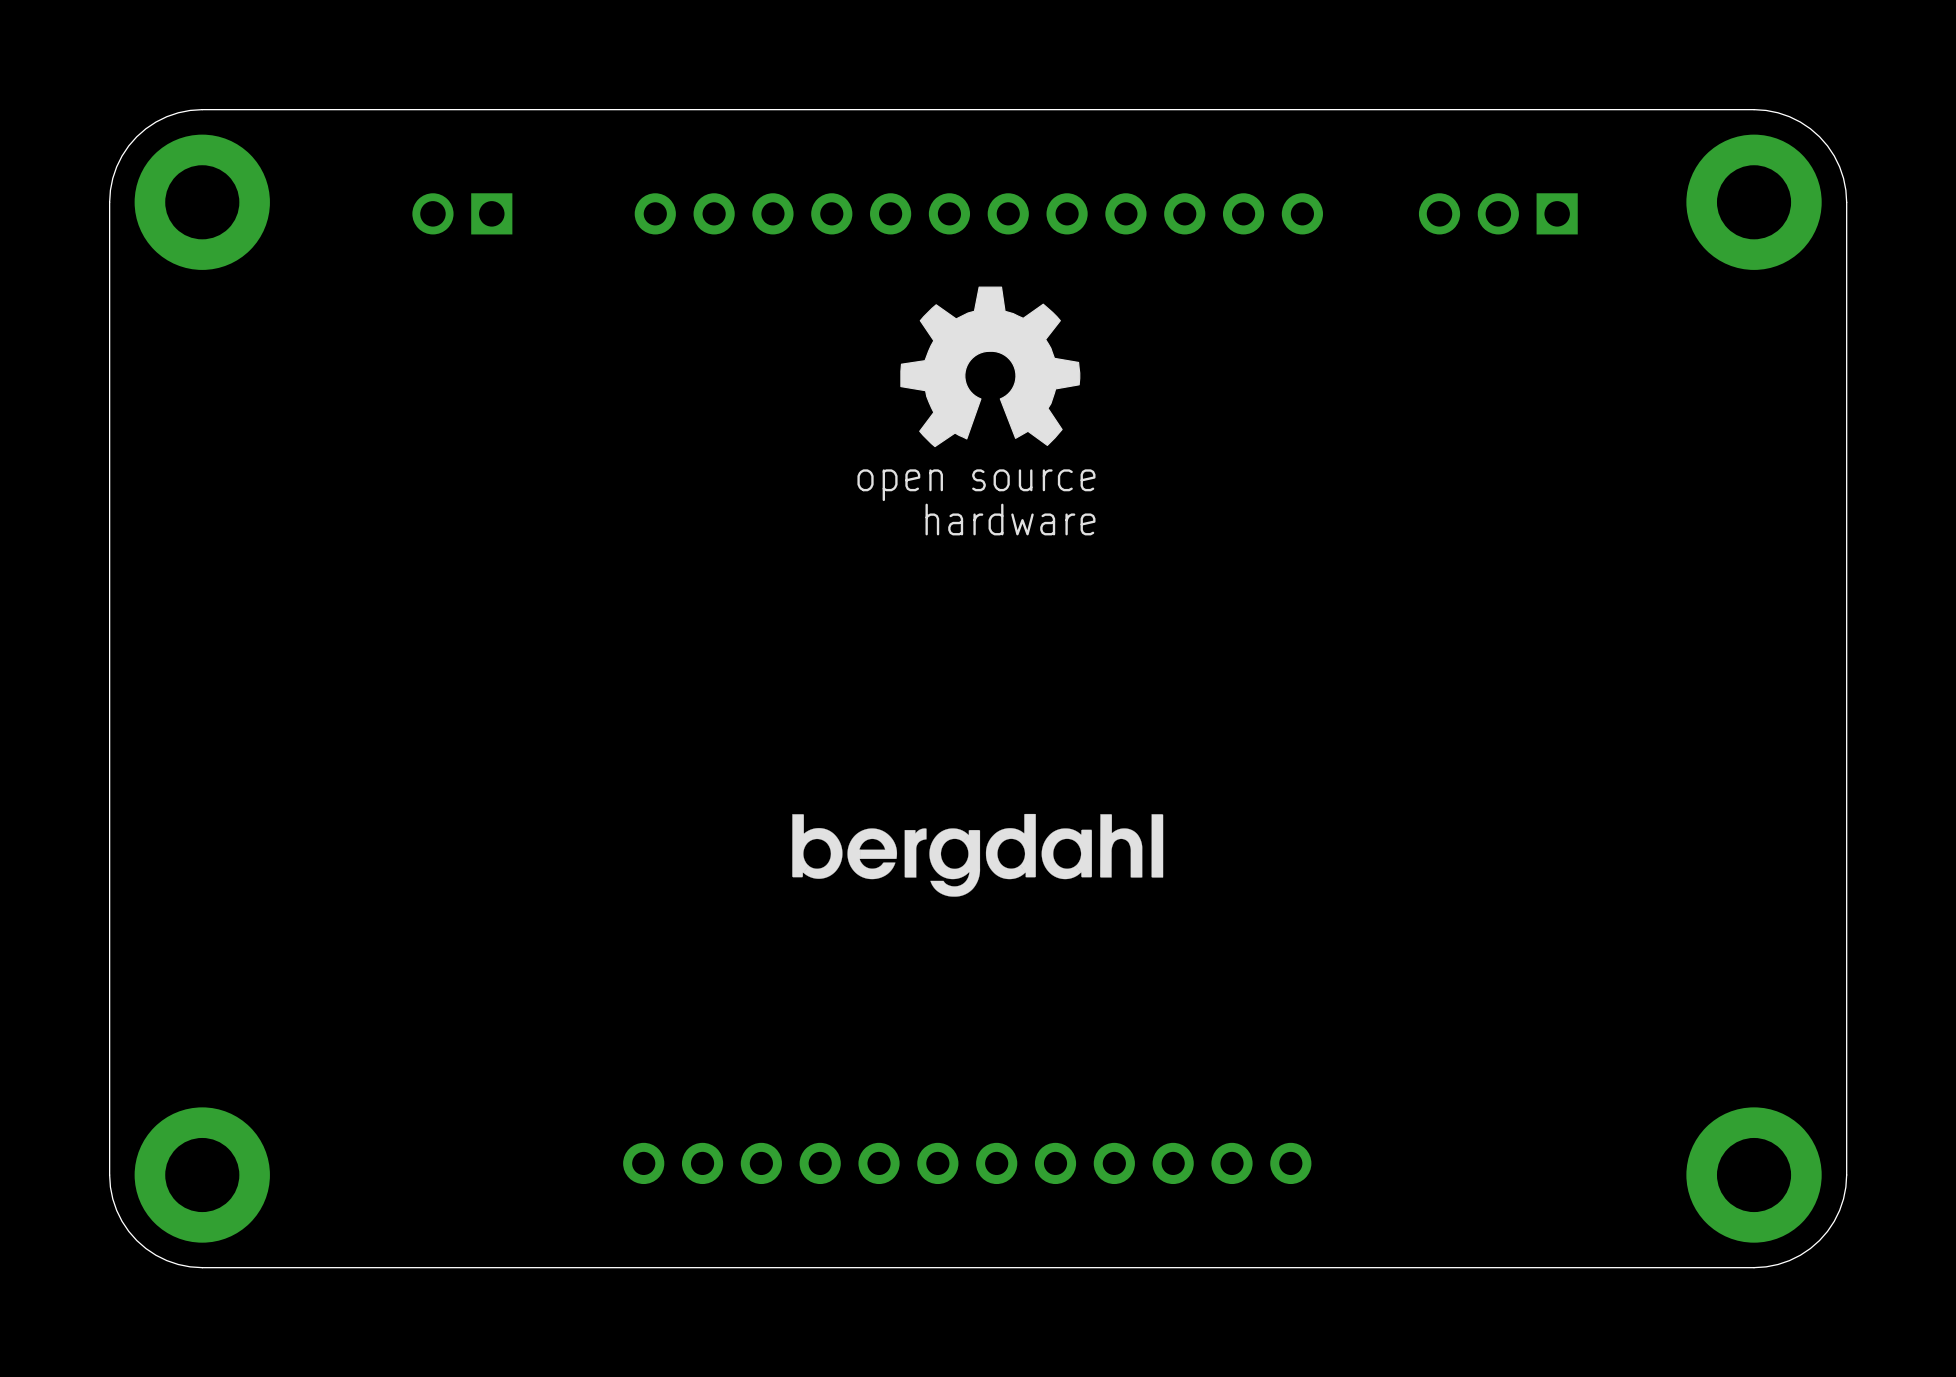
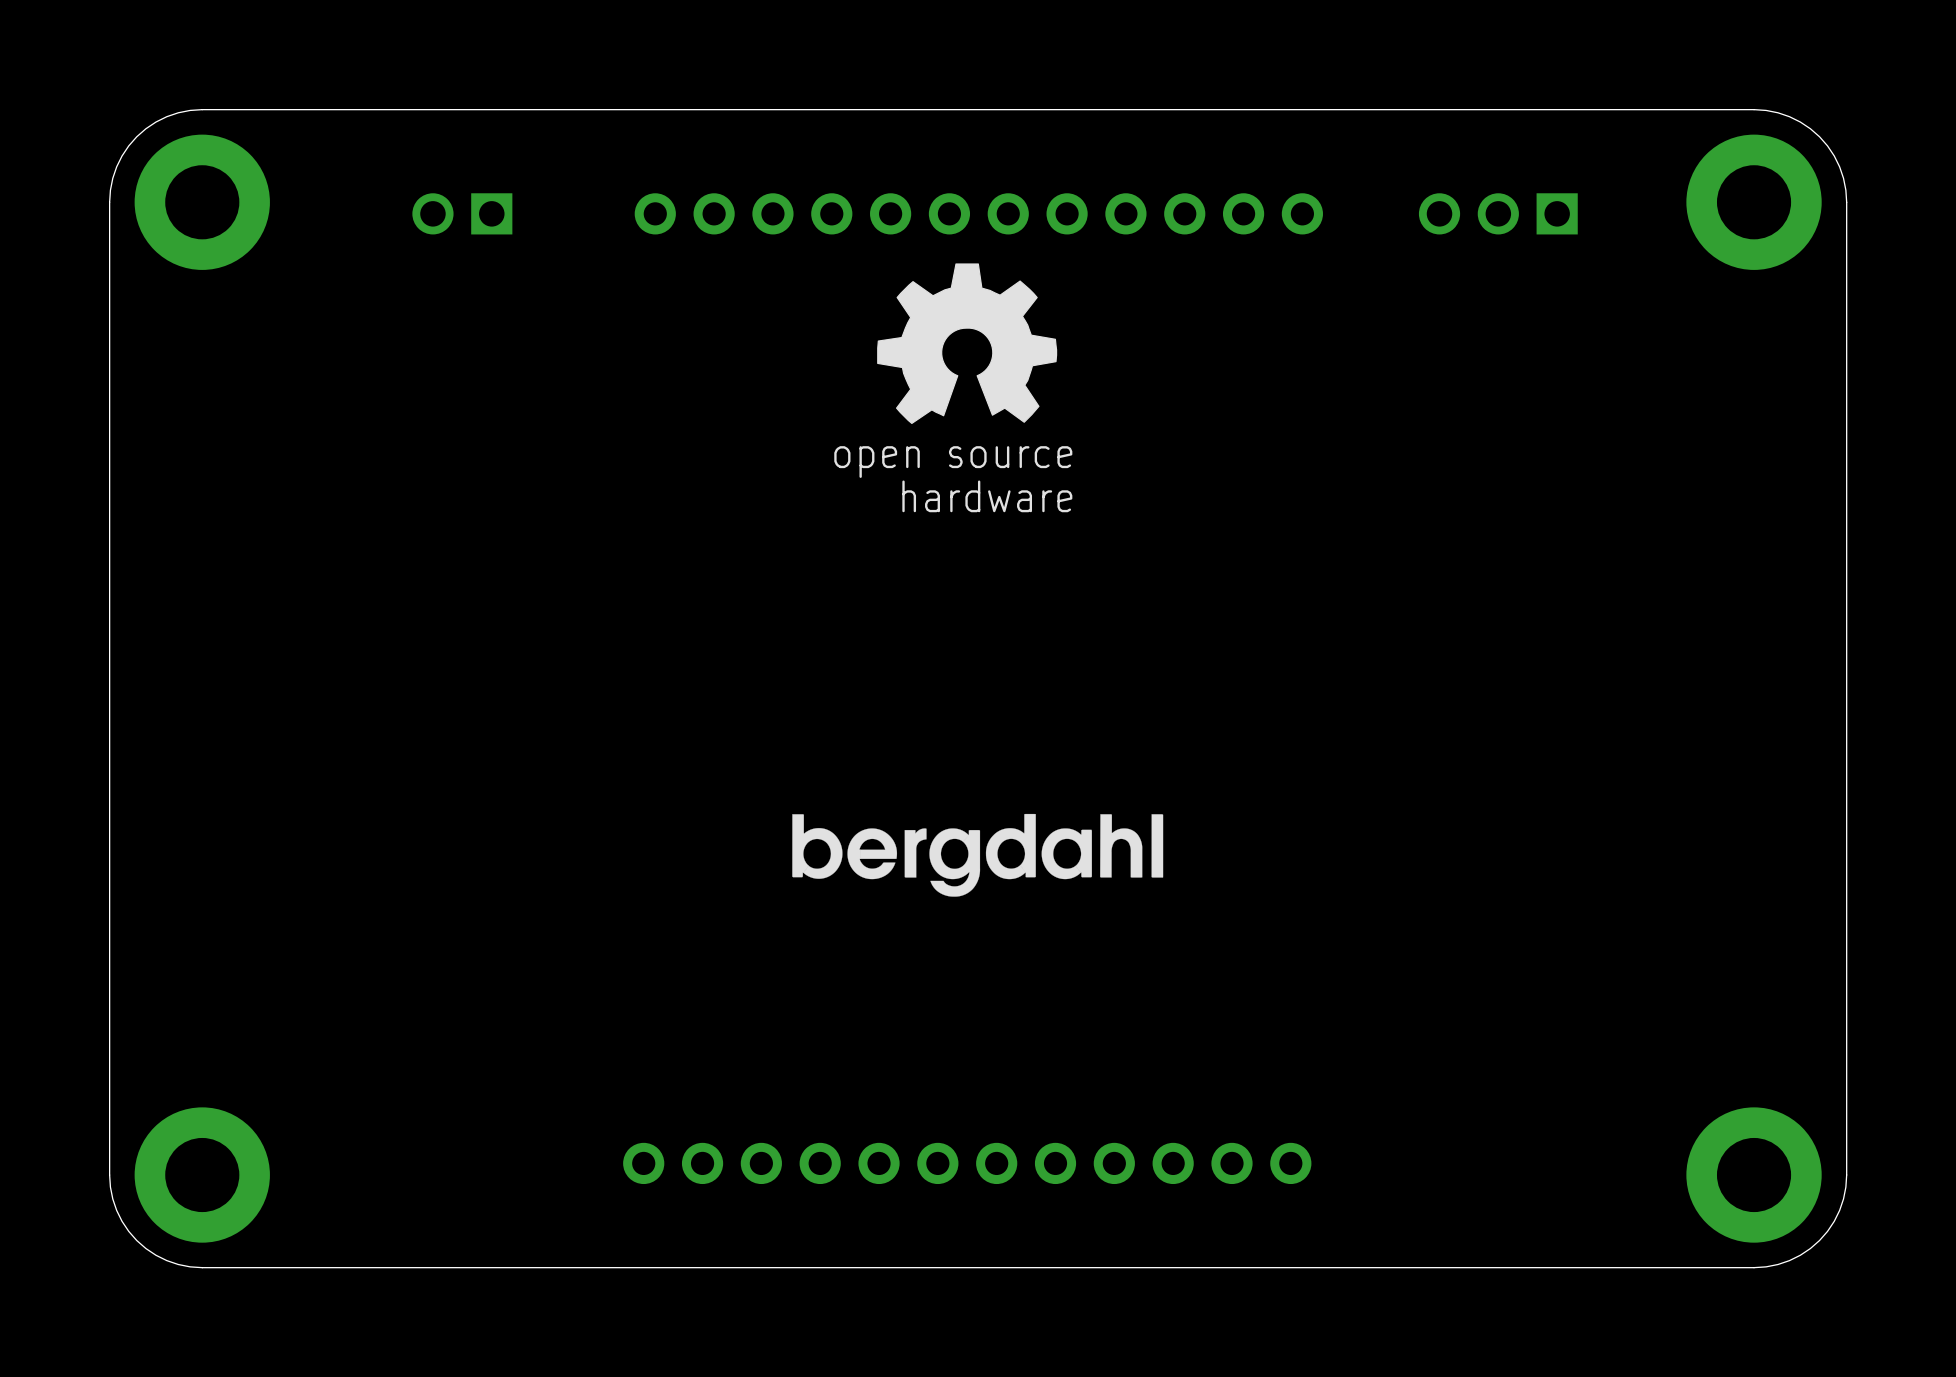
drawing position: (990, 366) -> (967, 343)

